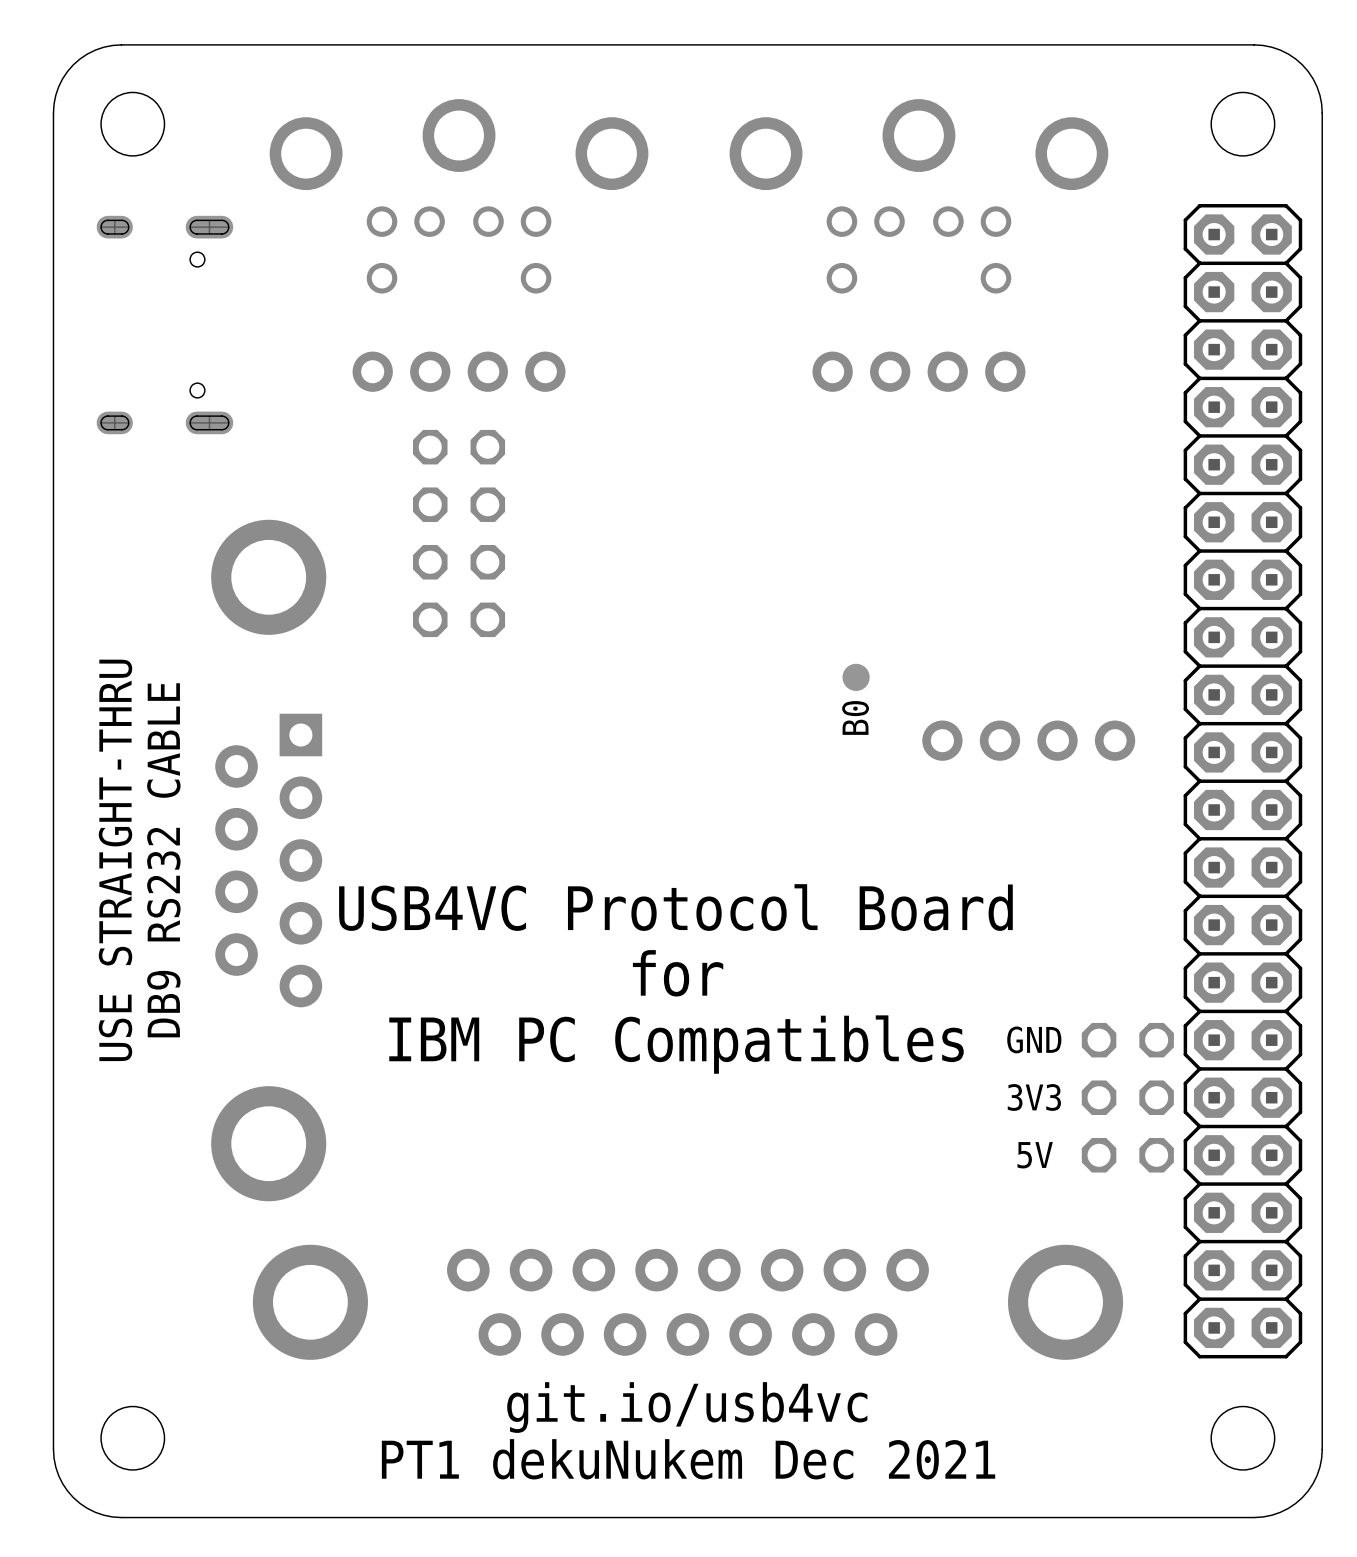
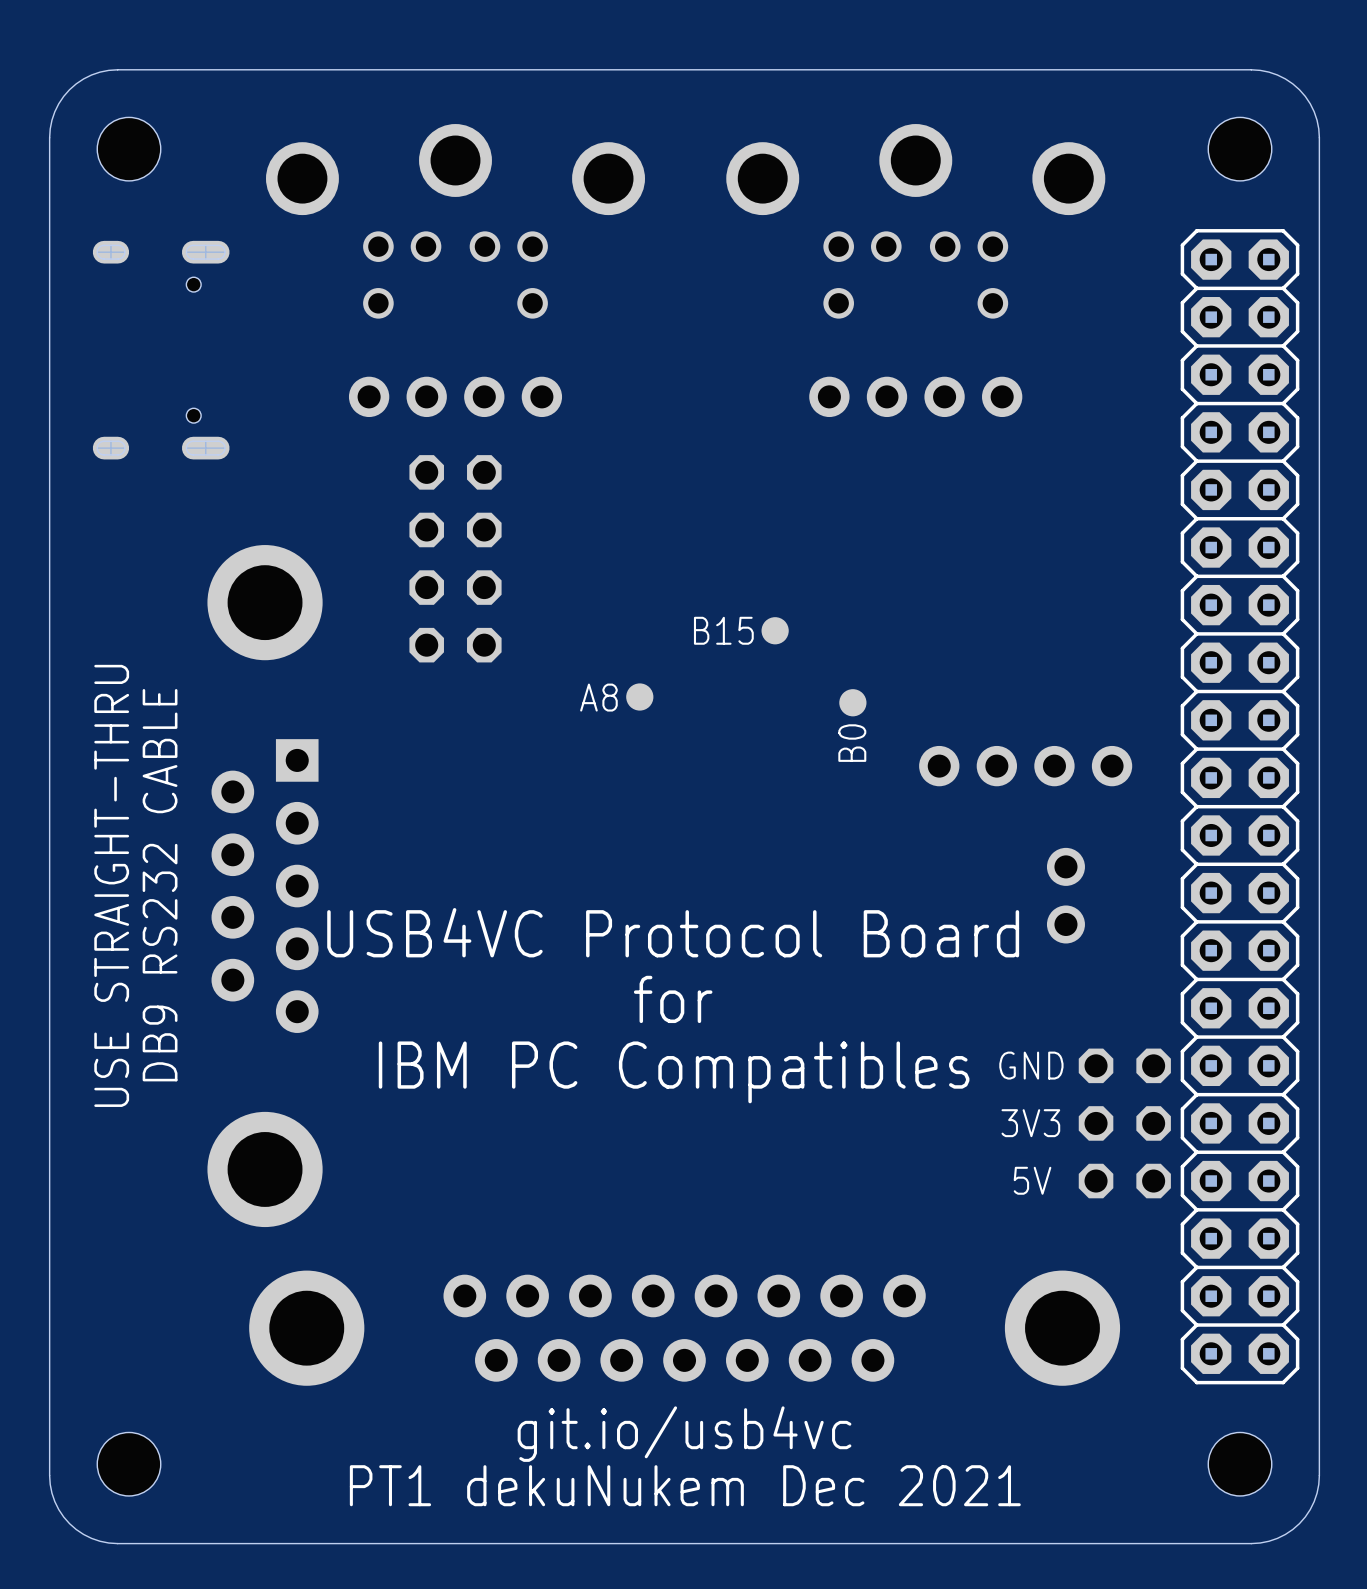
text: none -> B15 (723, 630)
part: none -> (775, 630)
part: none -> (639, 696)
text: none -> A8 (598, 697)
part: none -> (1065, 895)

